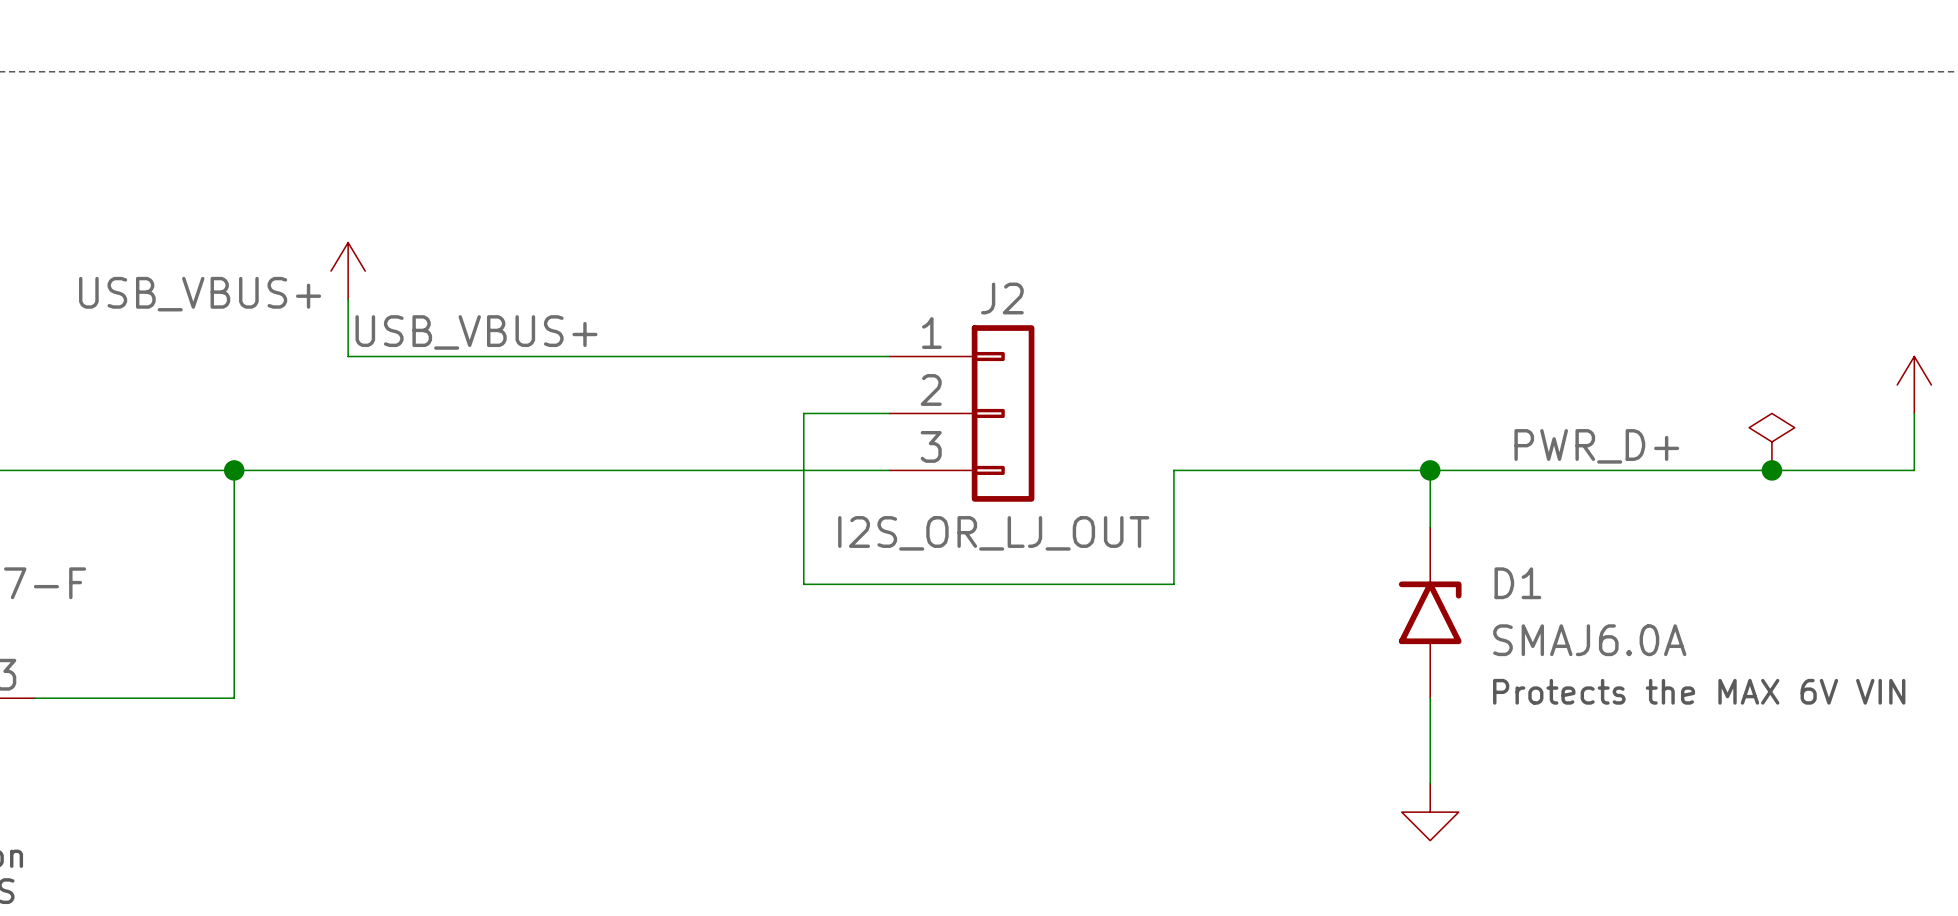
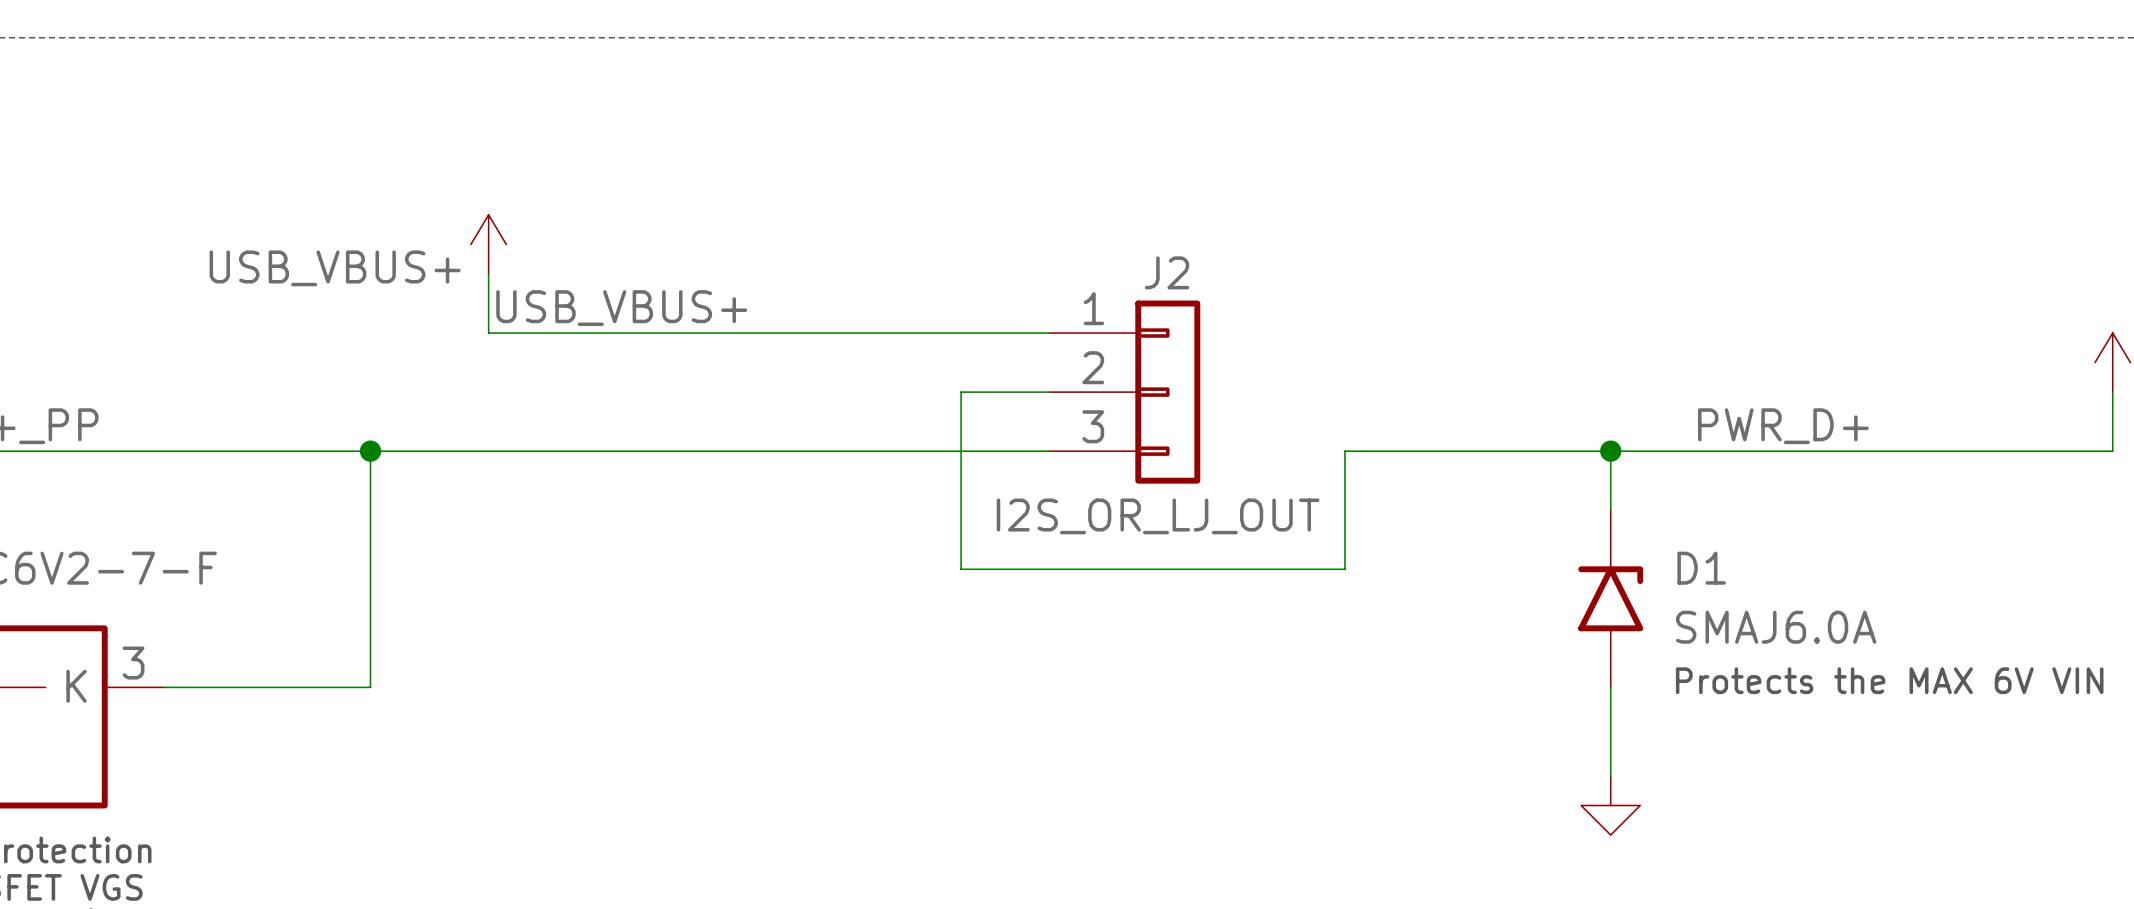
power symbol: (1771, 441) -> none
junction: (1771, 470) -> none

